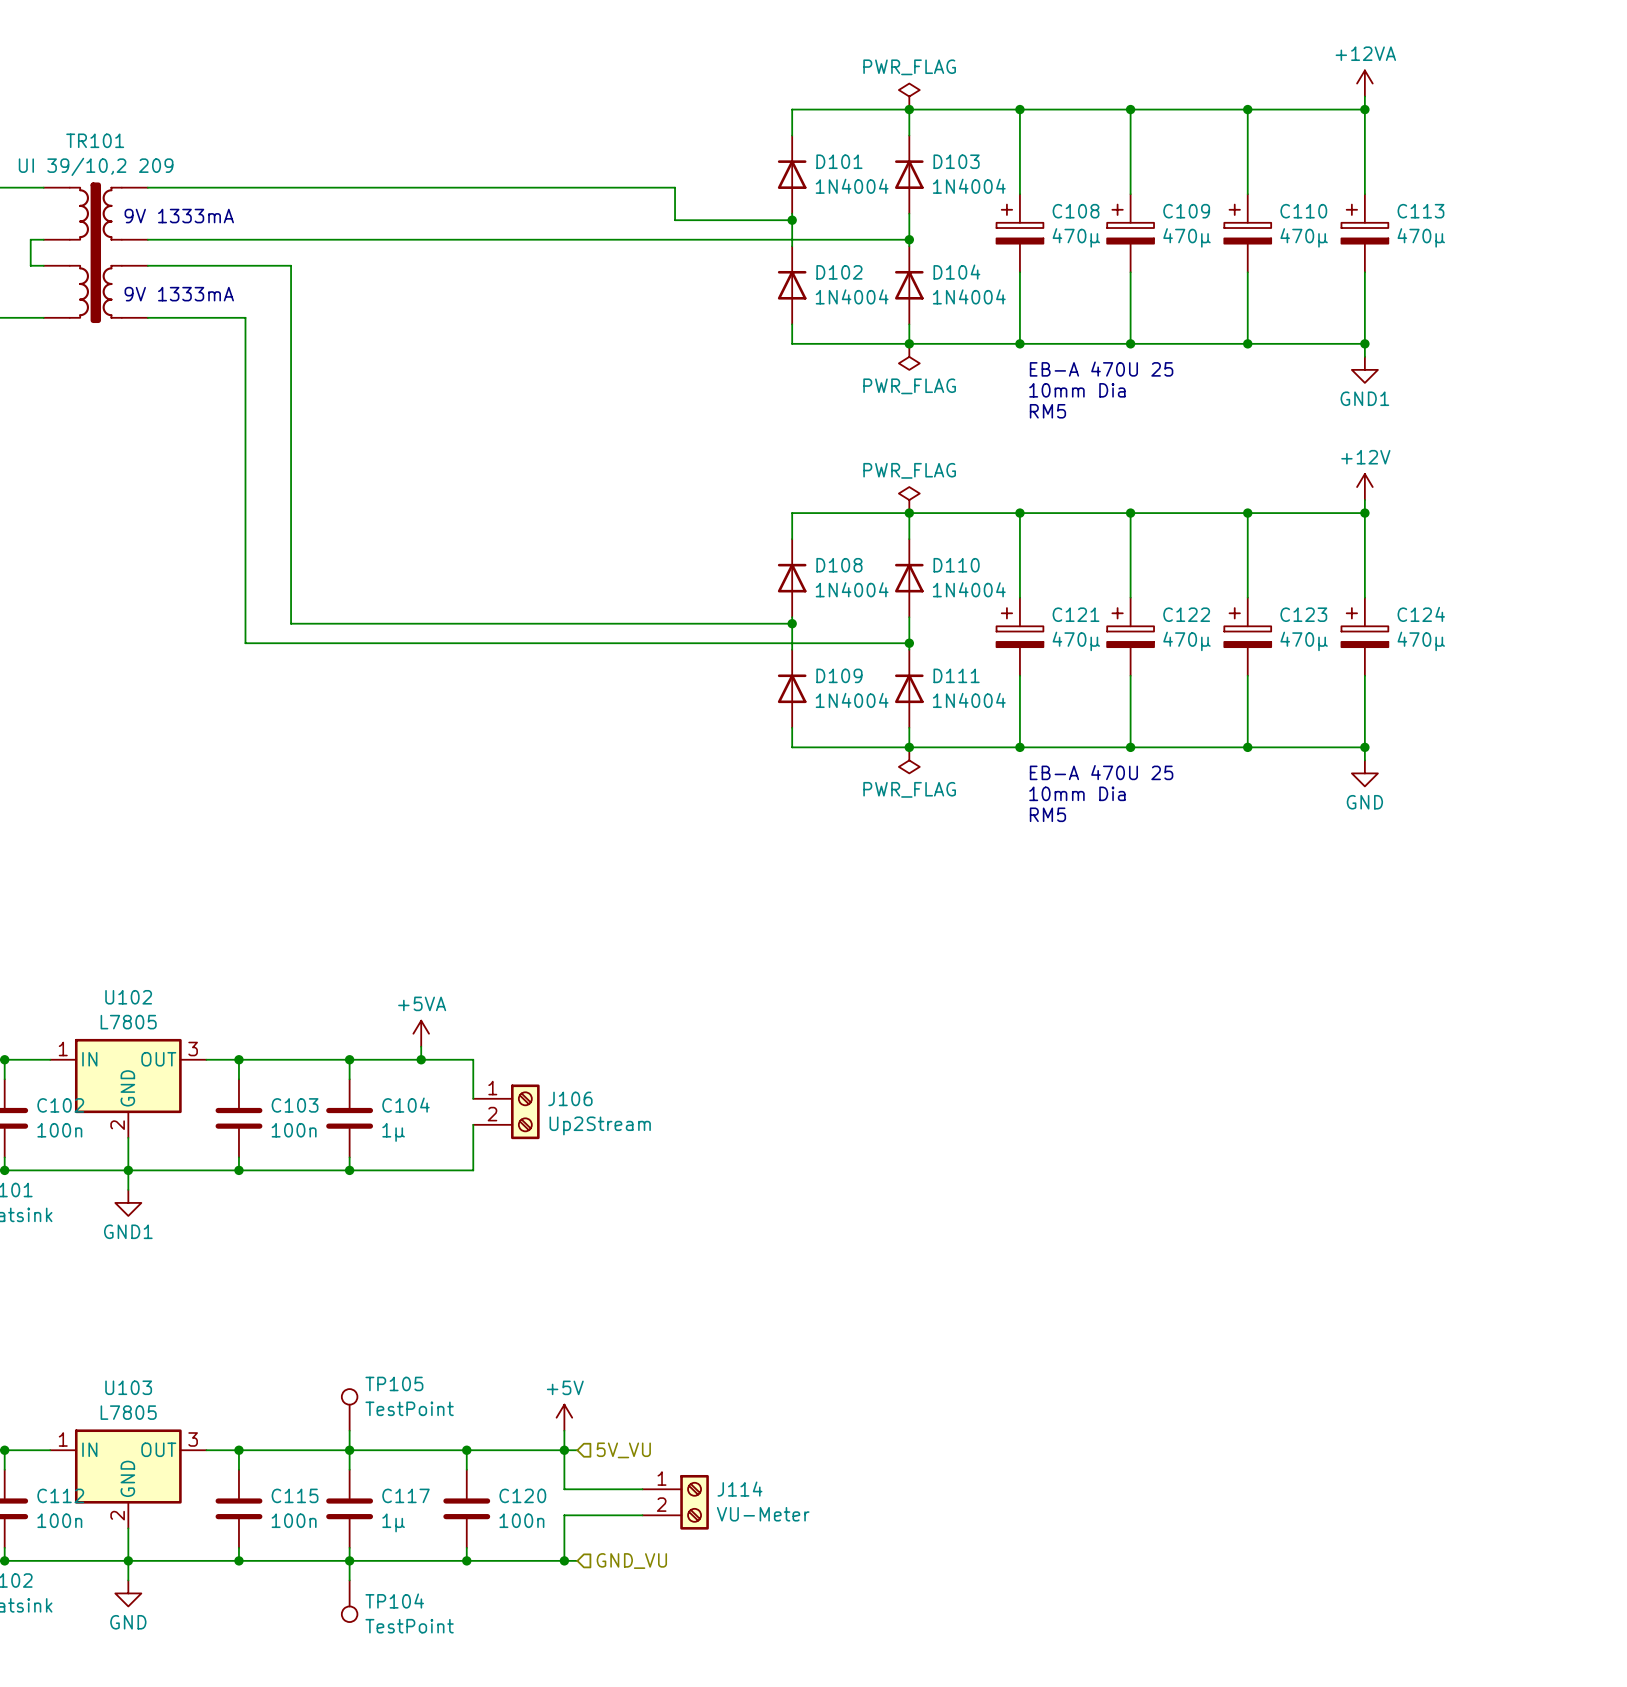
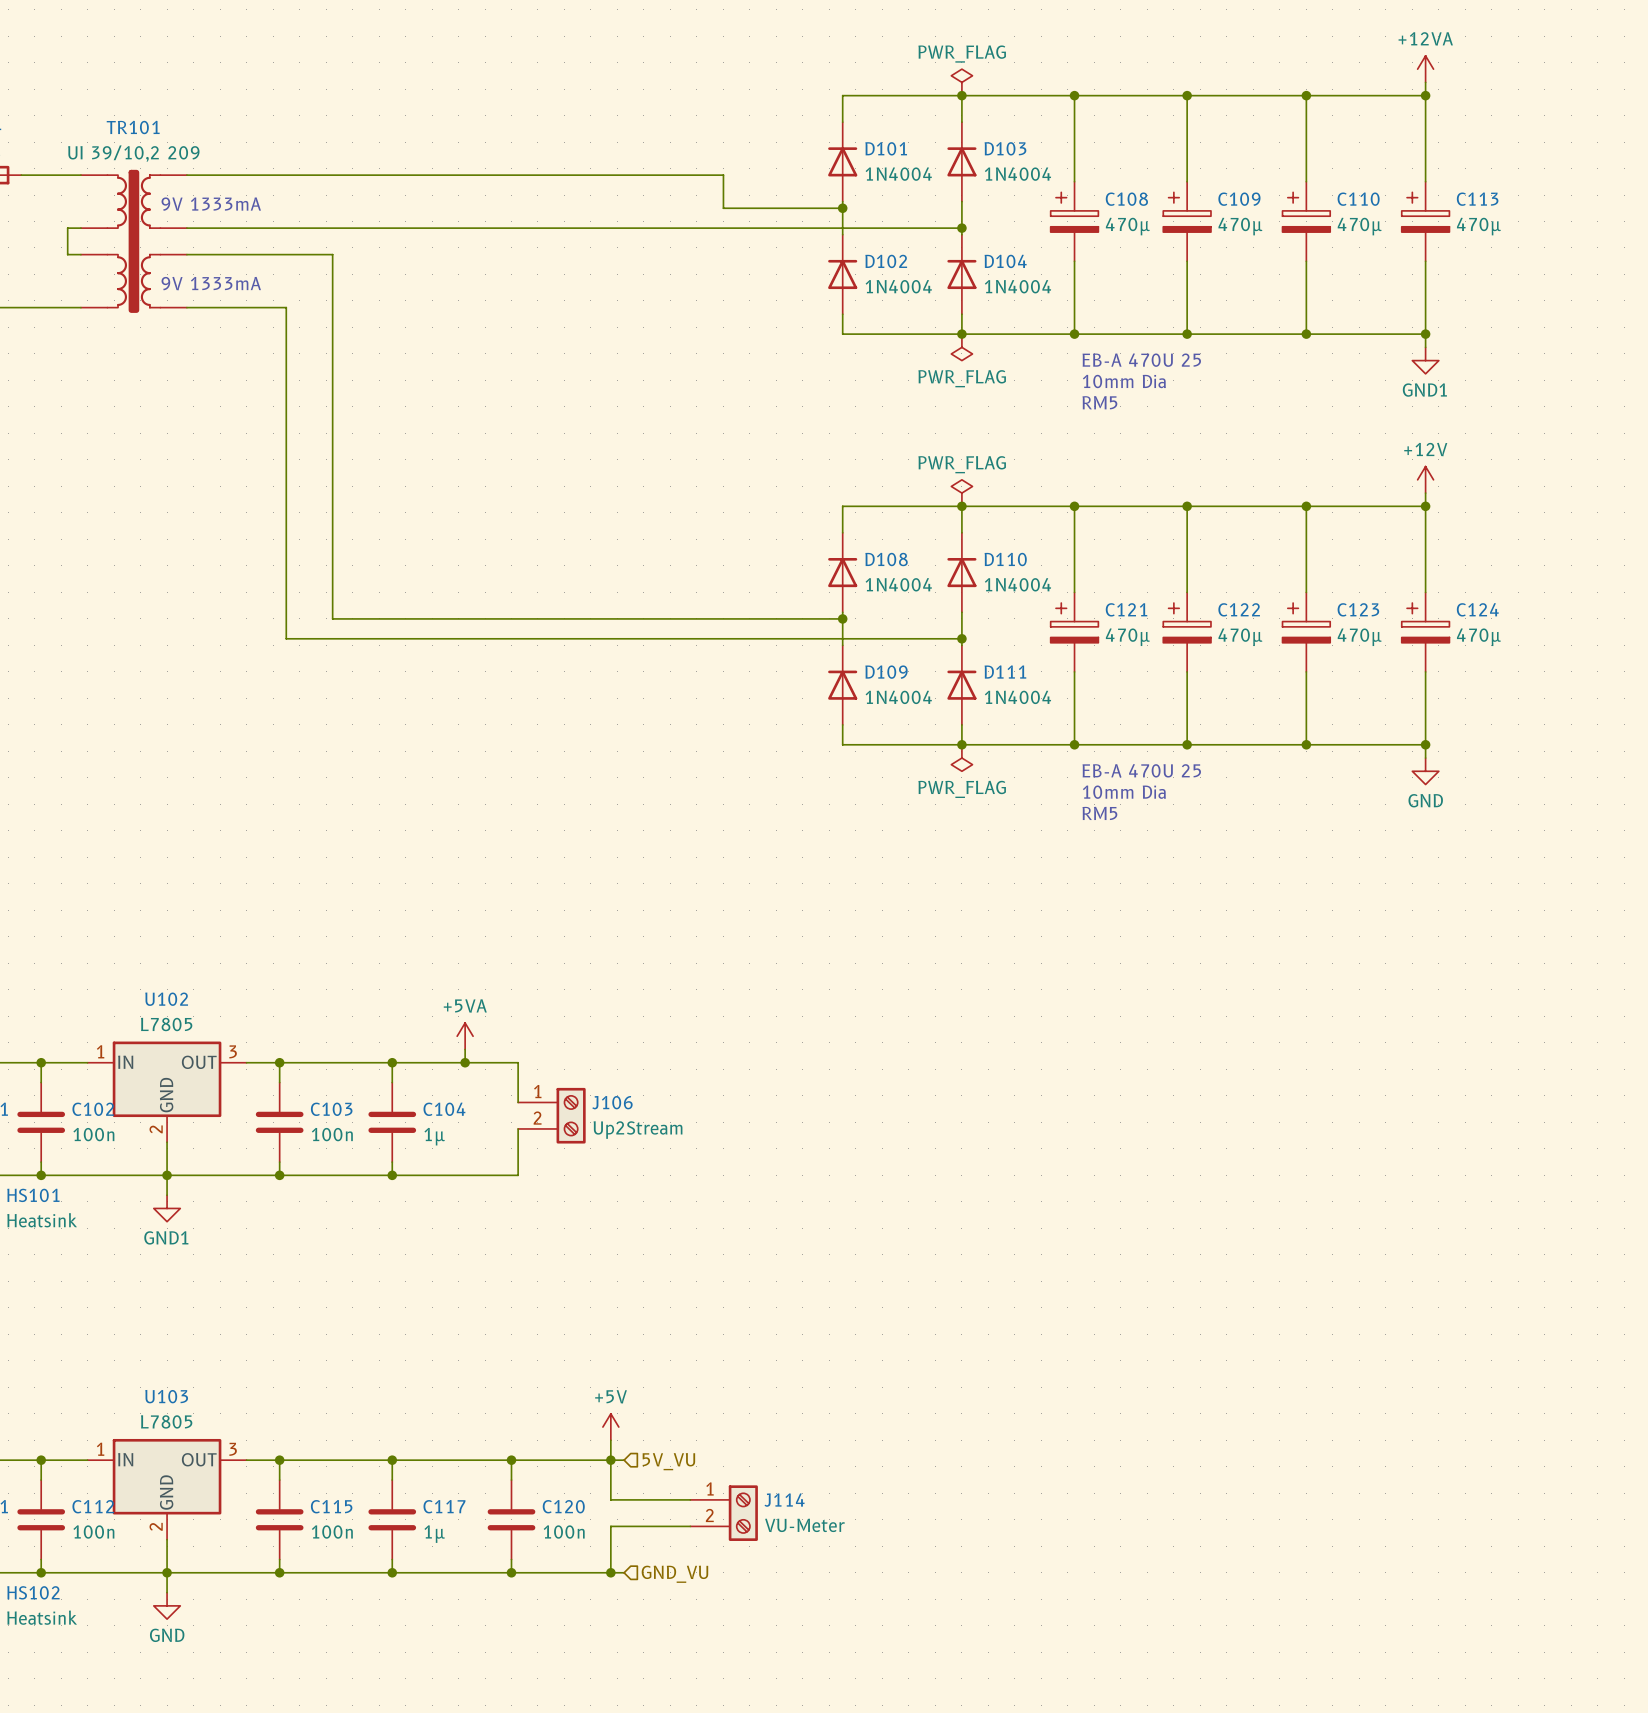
TP105: TestPoint (349, 1409) -> none
wire: (349, 1430) (349, 1450) -> none
wire: (349, 1560) (349, 1580) -> none
TP104: TestPoint (349, 1601) -> none

